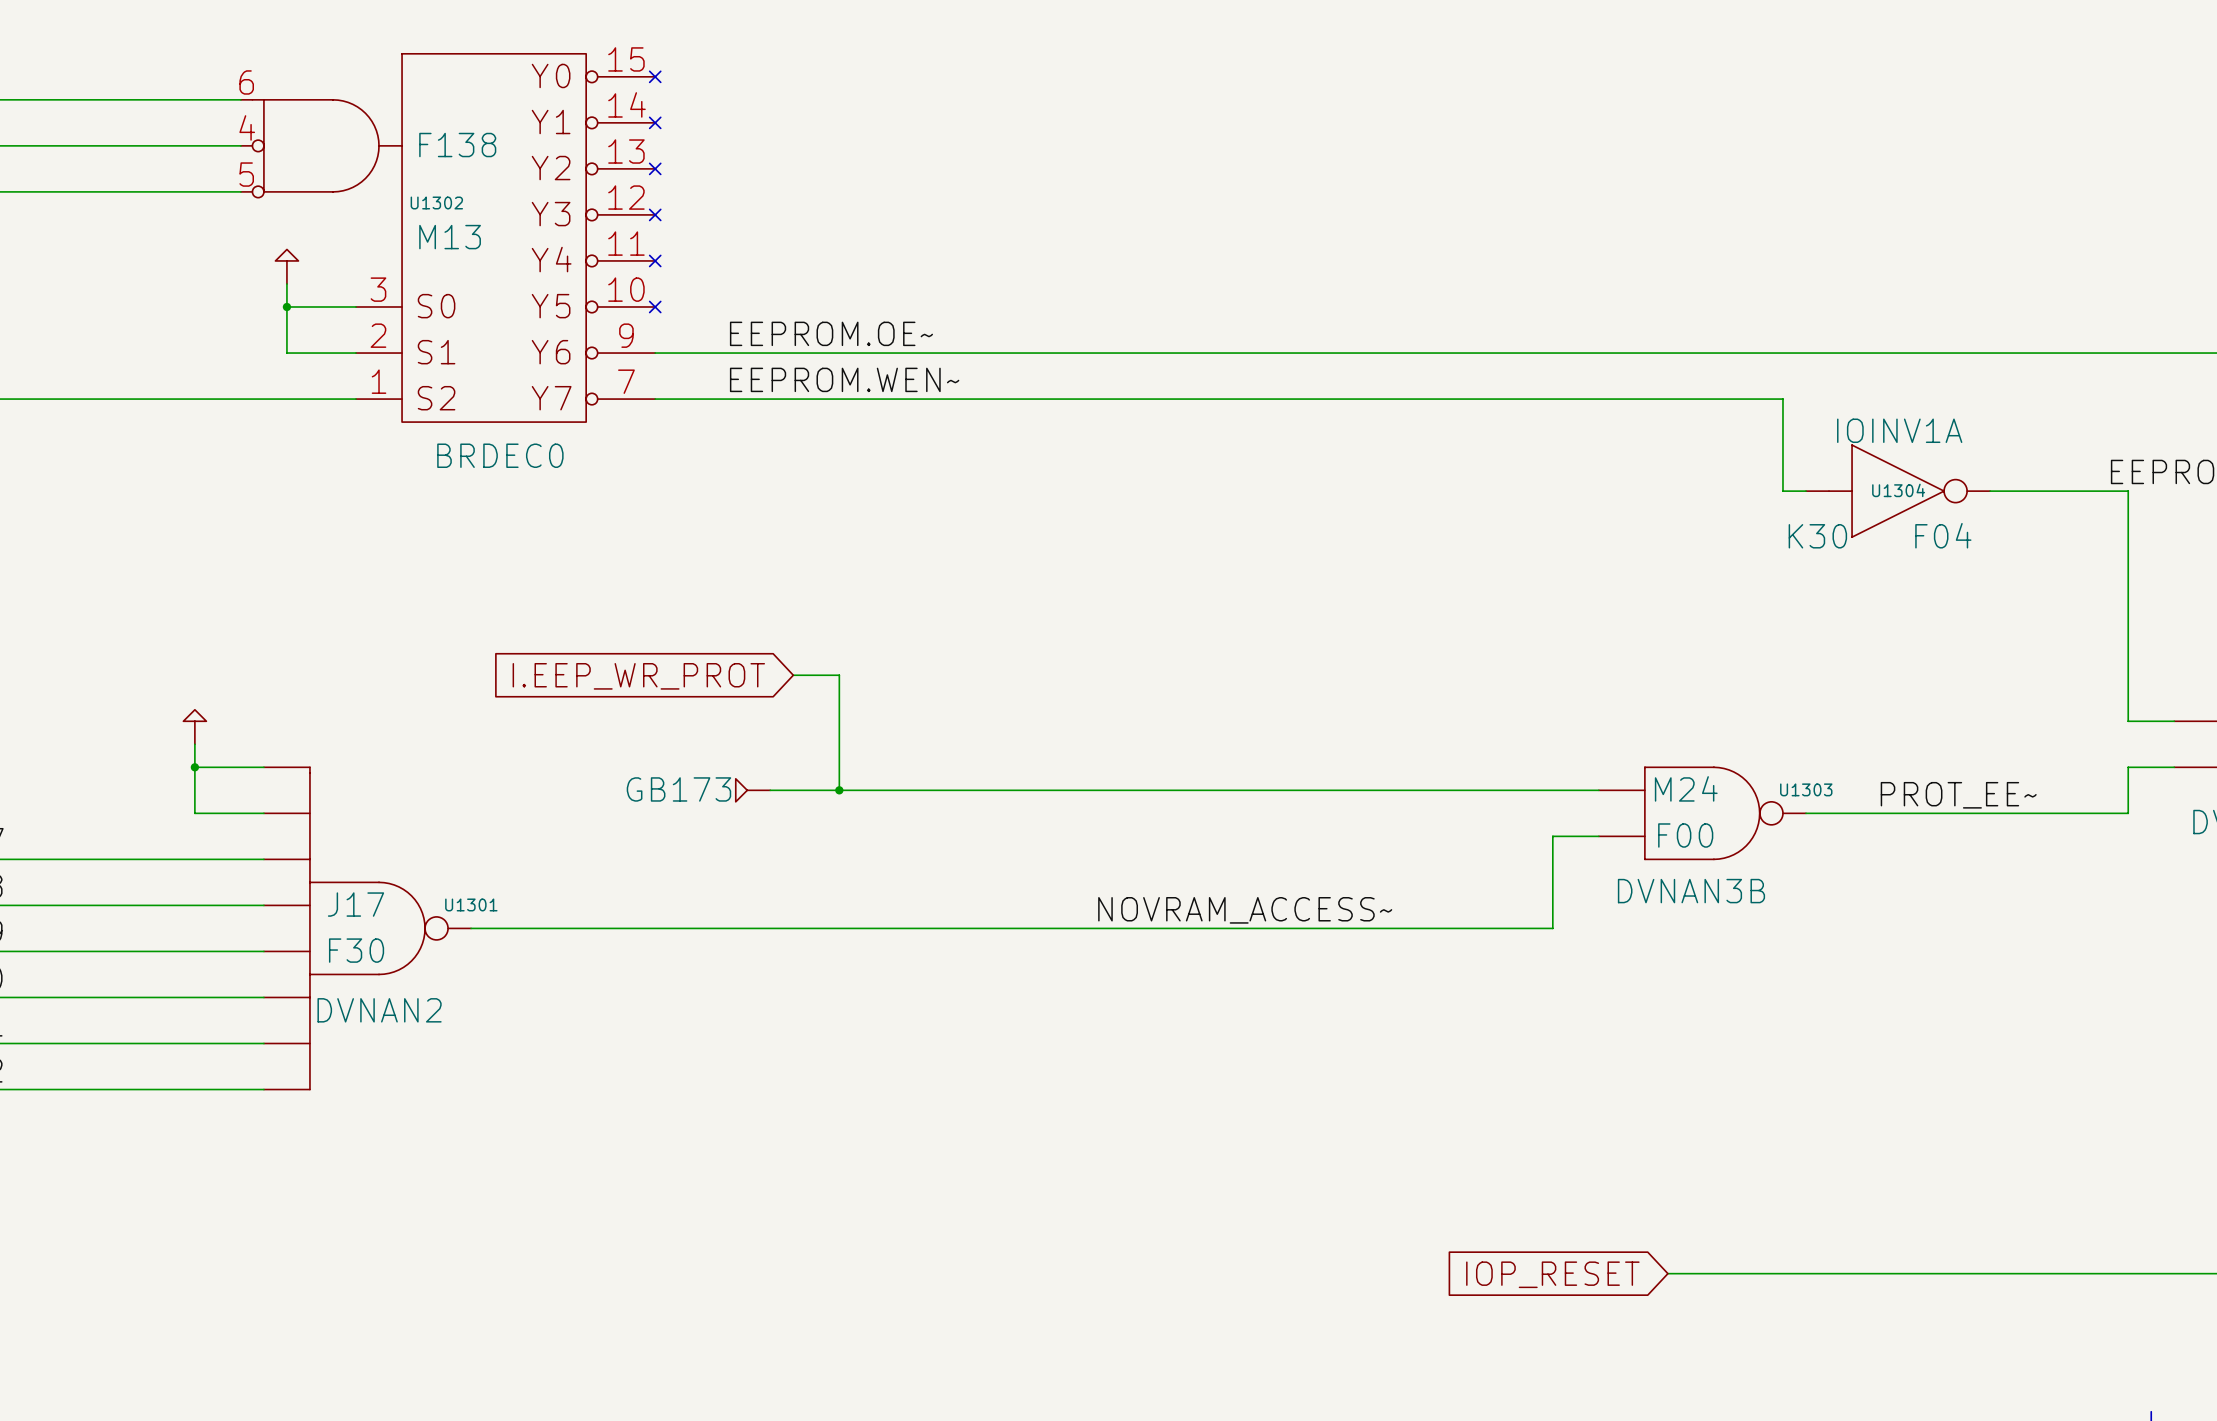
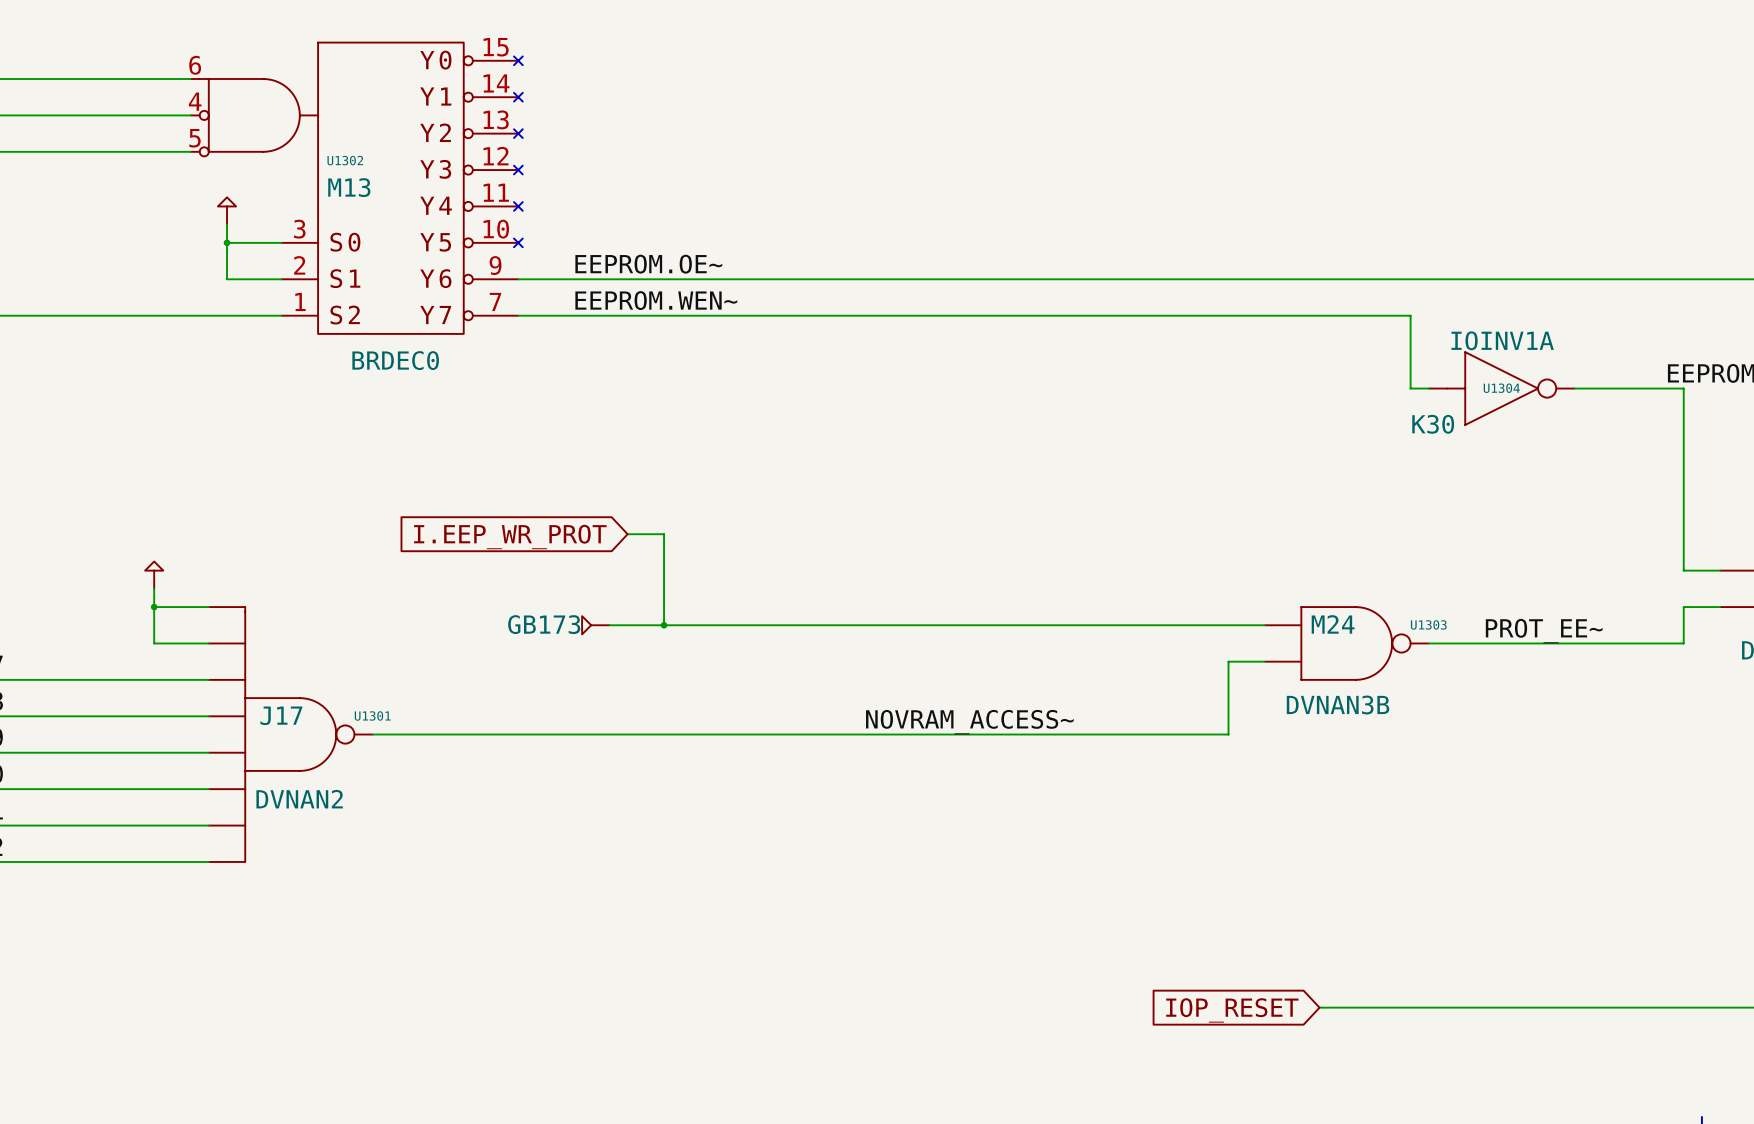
U1302 value: F138 (457, 145) -> none
U1304 value: F04 (1943, 535) -> none
U1303 value: F00 (1685, 835) -> none
U1301 value: F30 (356, 950) -> none

